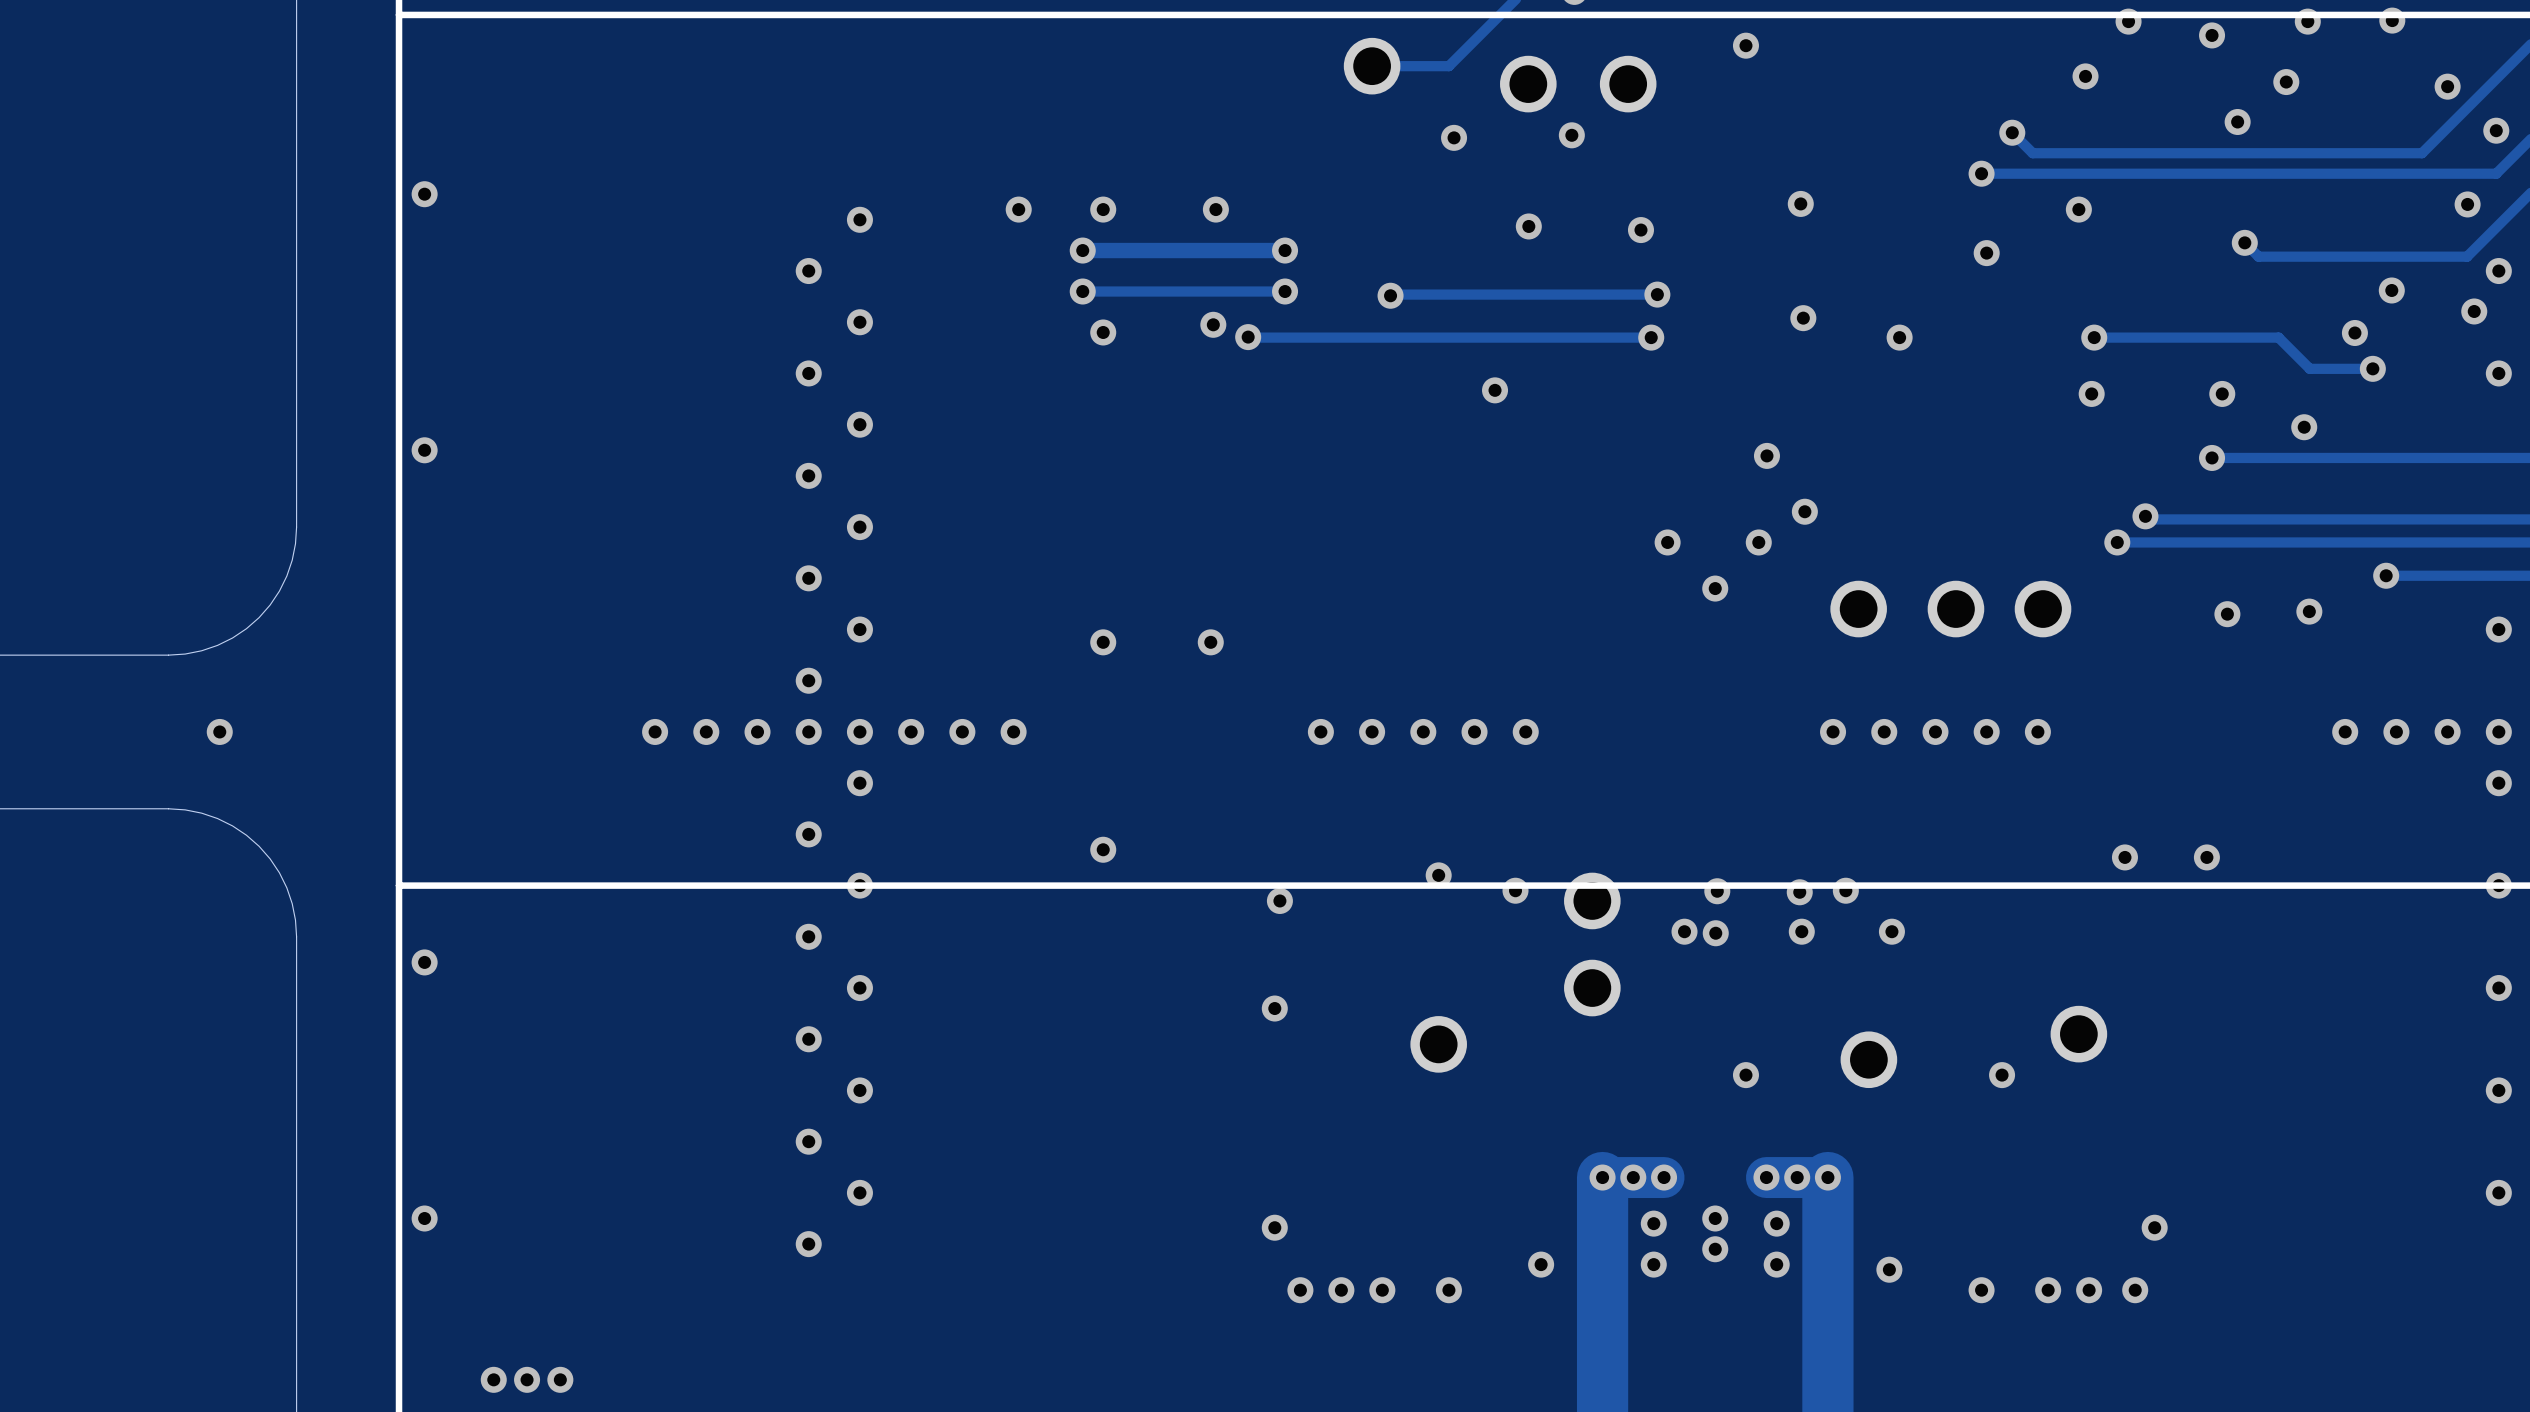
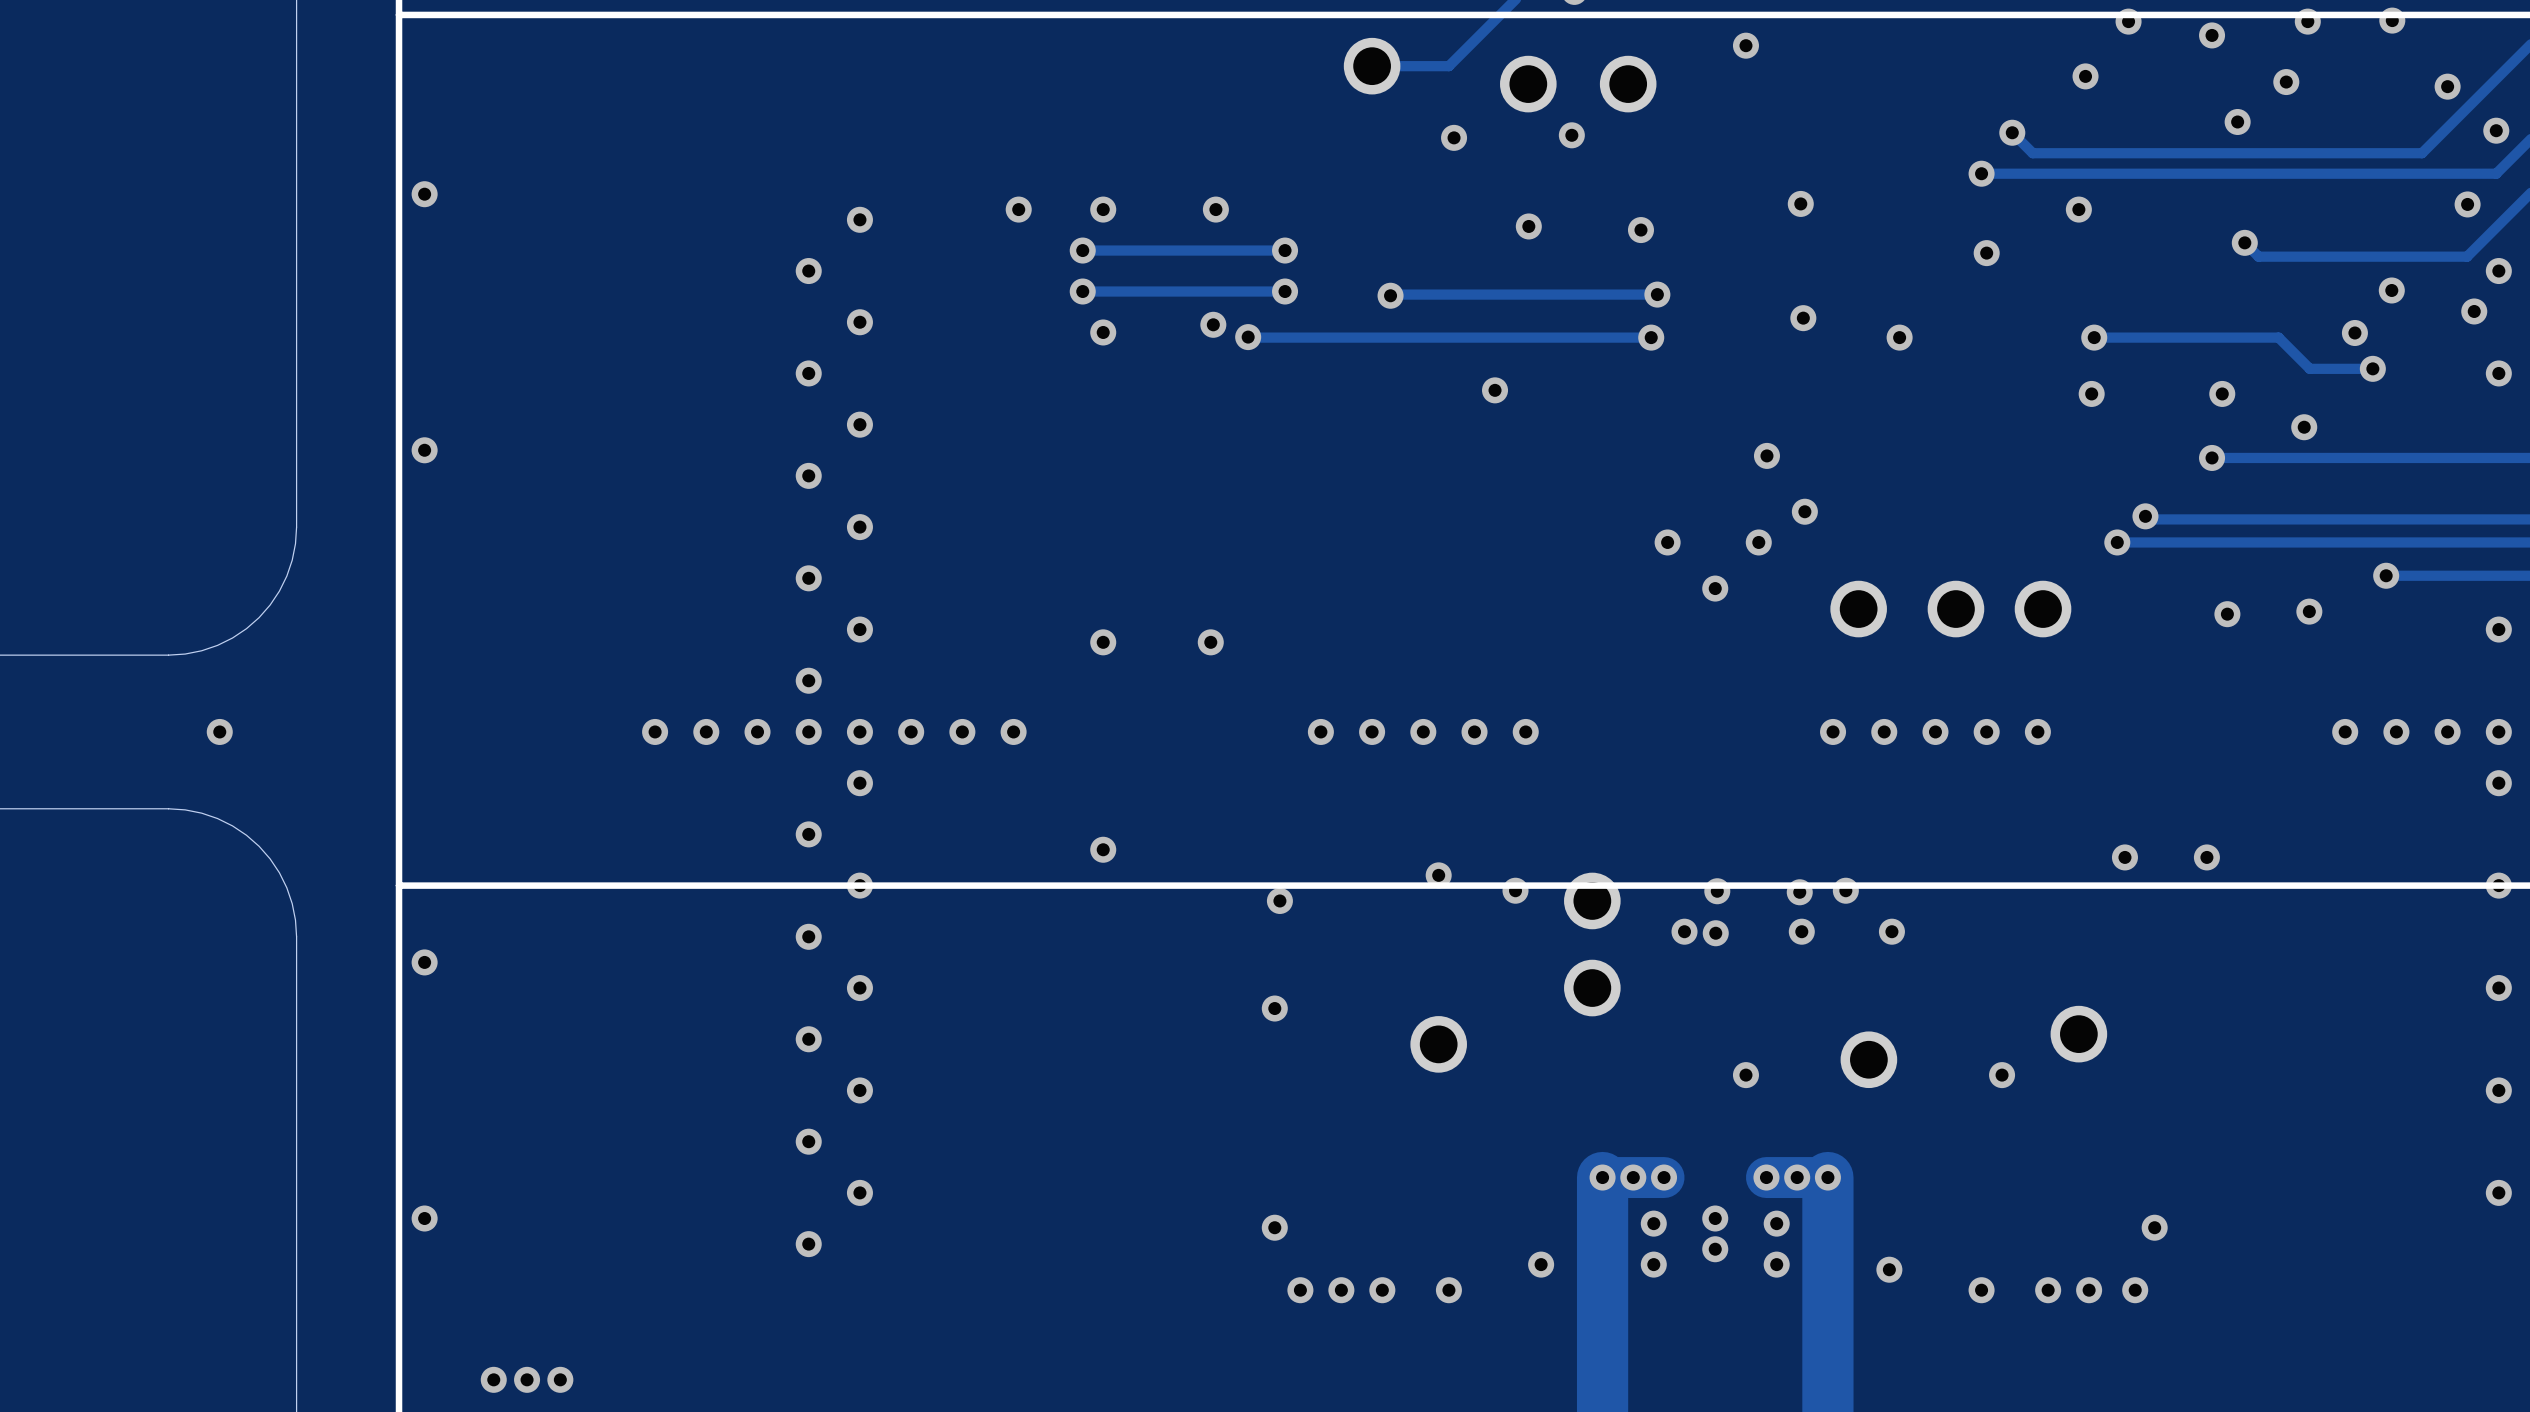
track width: thick (1285, 250) (1082, 250) -> thin (1285, 250) (1082, 250)

